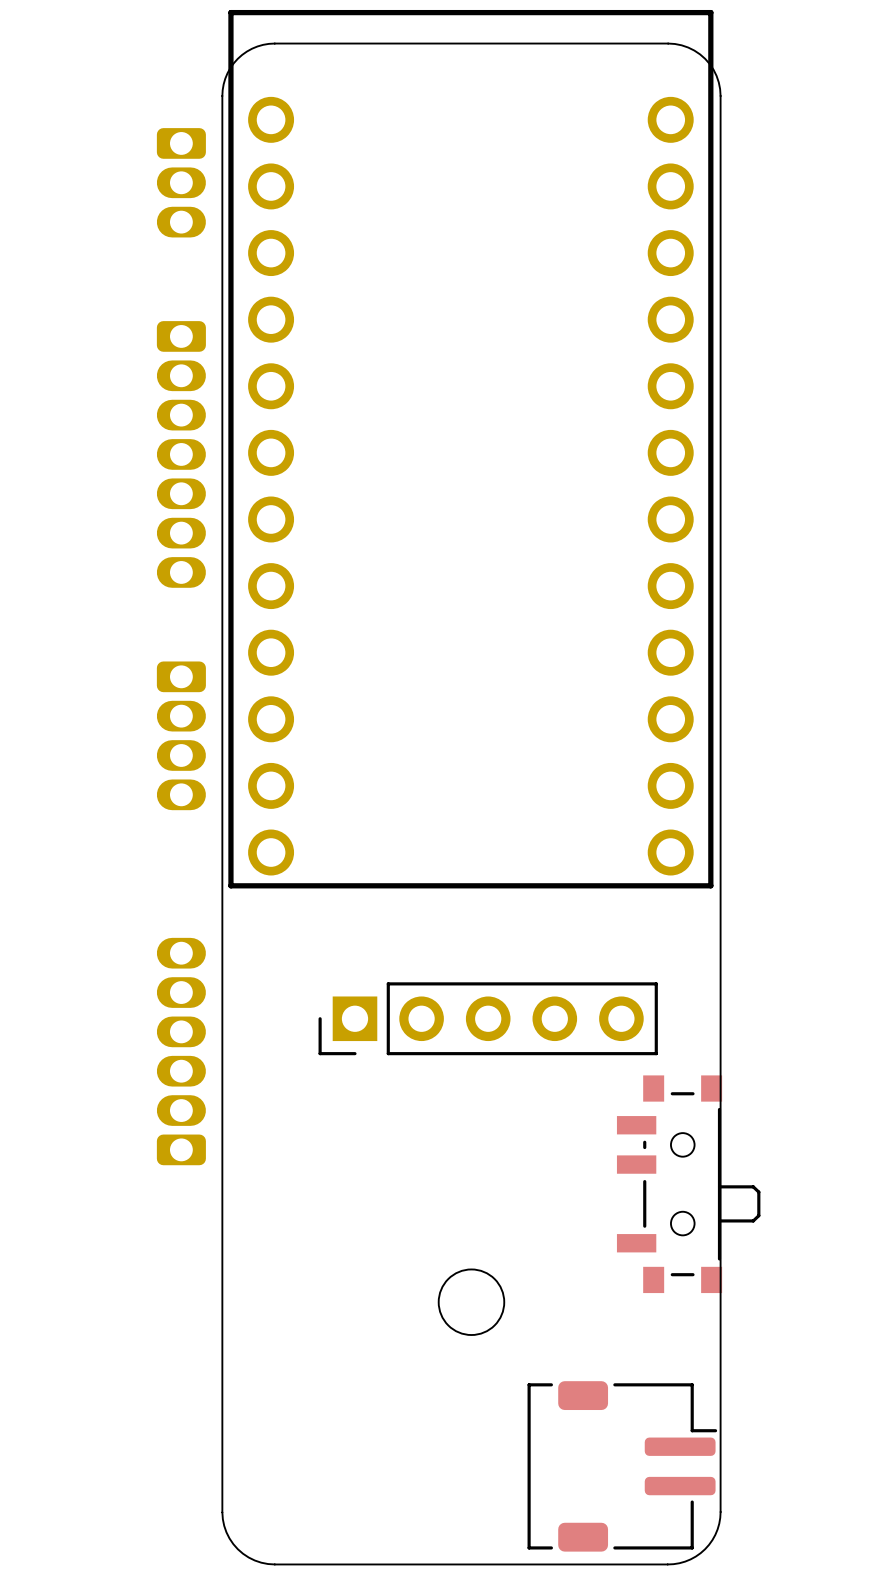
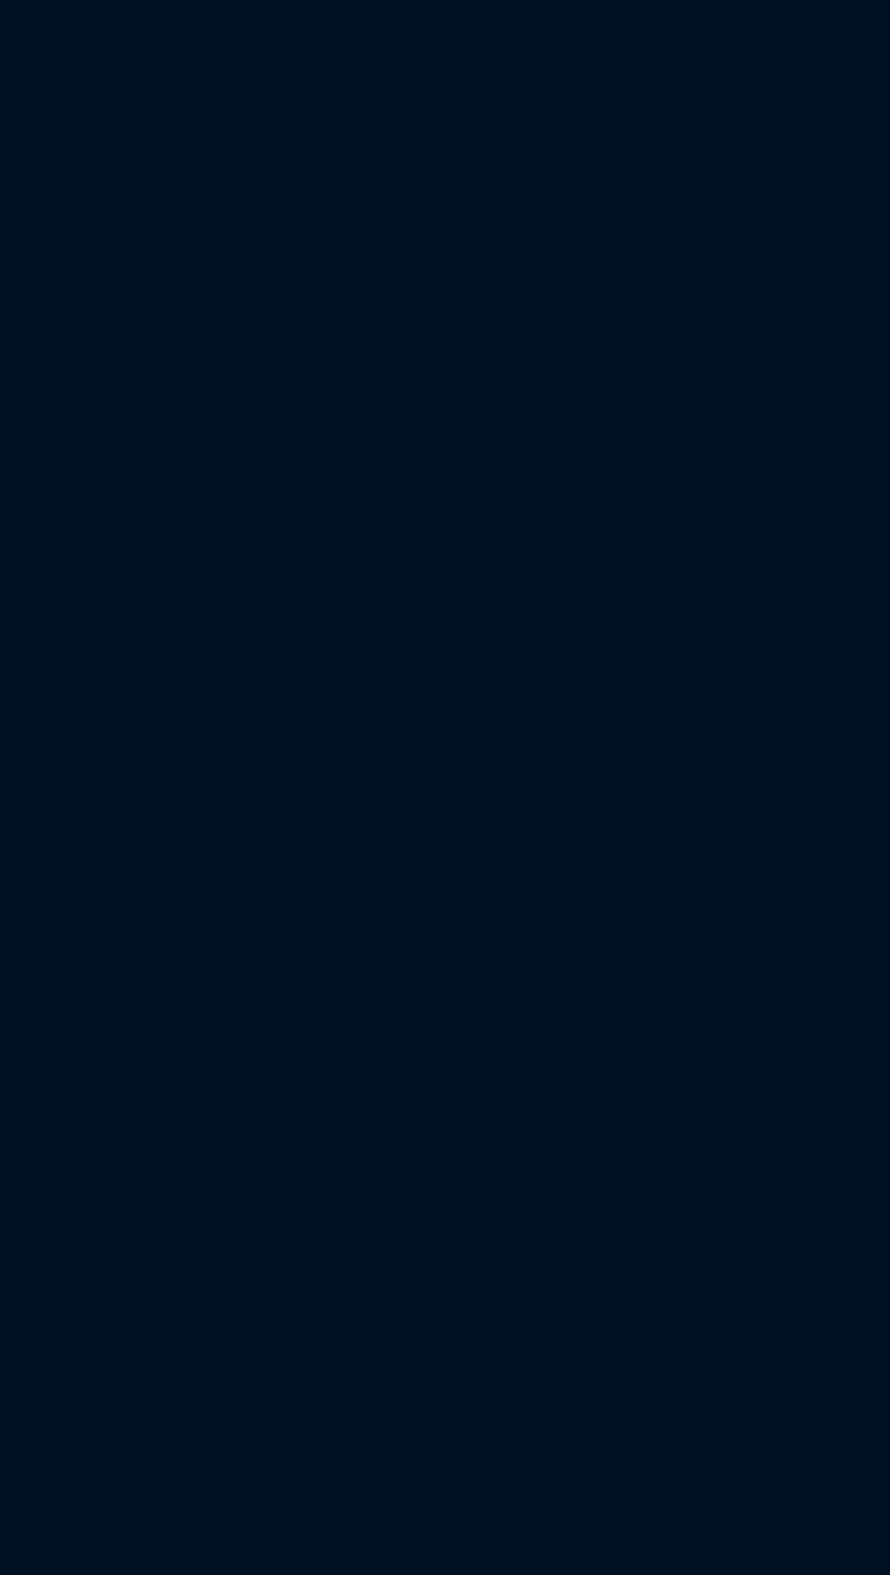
board edge: (274, 43) (674, 43) (694, 50) (705, 58) (713, 69) (718, 82) (720, 95) (720, 1512) (717, 1529) (709, 1544) (695, 1556) (679, 1563) (268, 1564) (248, 1557) (237, 1549) (229, 1538) (224, 1525) (222, 1512) (222, 95) (225, 78) (237, 58) (257, 46) (274, 43) -> none
part: (181, 182) -> none
part: (470, 449) -> none
part: (181, 454) -> none
part: (181, 735) -> none
part: (488, 1018) -> none
part: (181, 1051) -> none
part: (688, 1184) -> none
round board edge: [438, 1269, 505, 1336] -> none
part: (622, 1466) -> none

